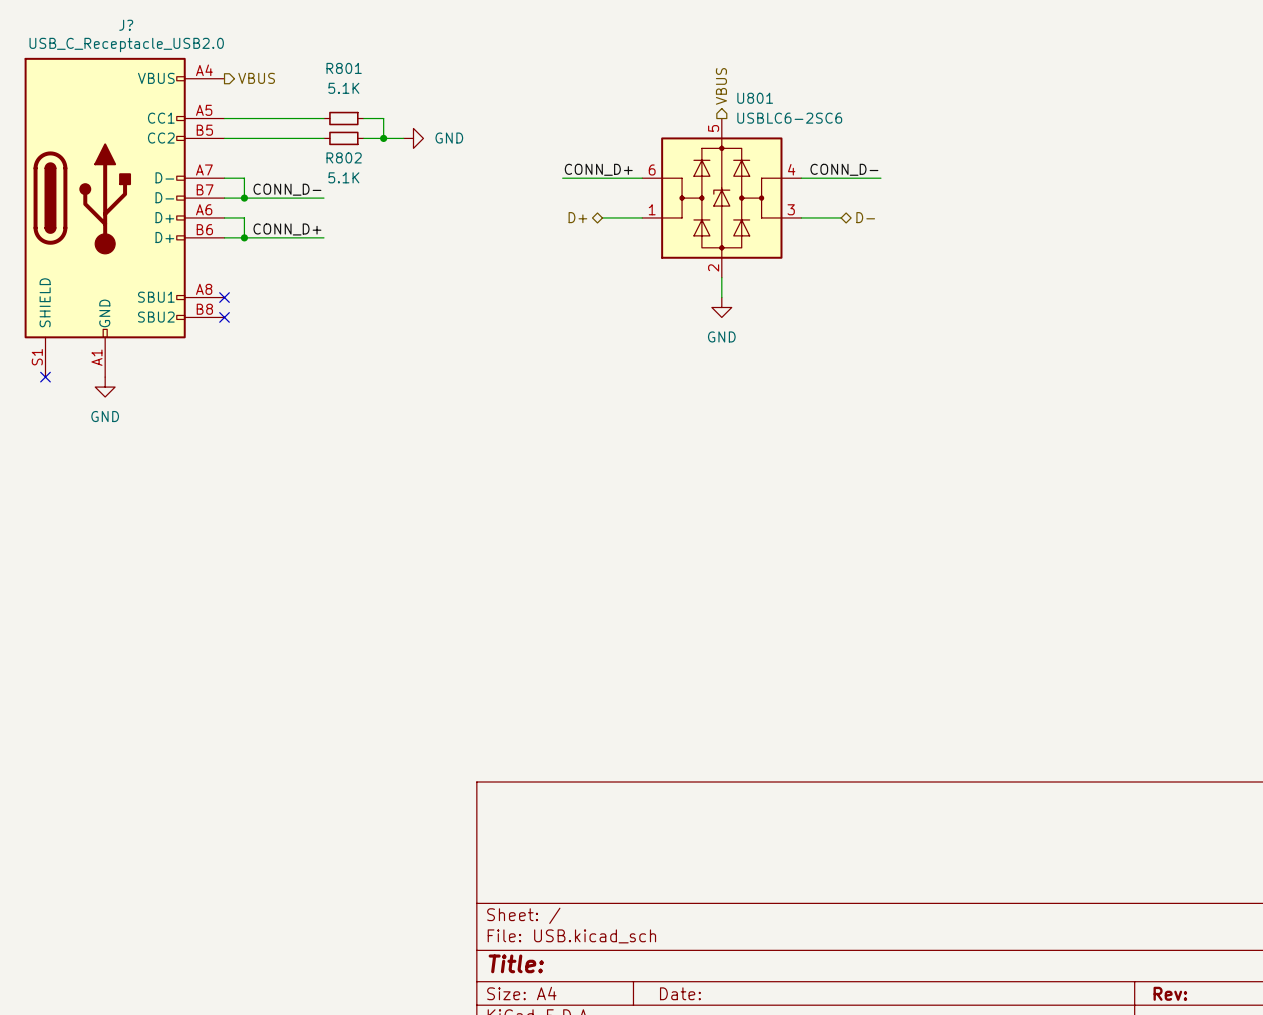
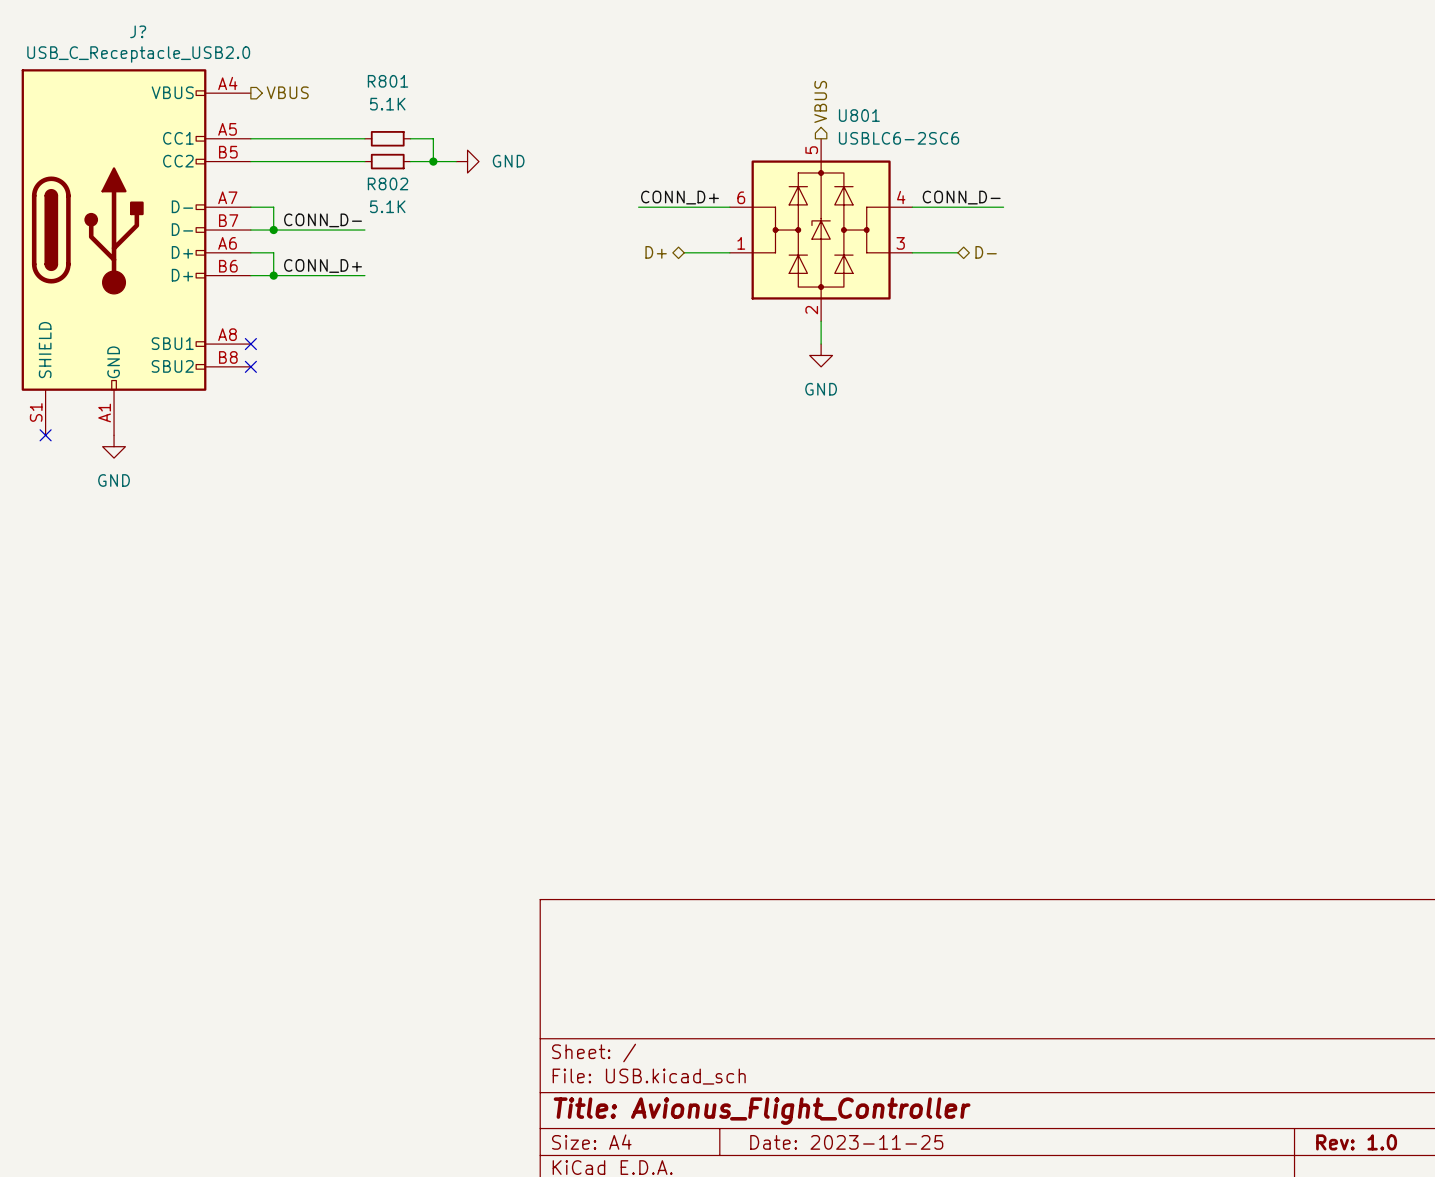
title block: Title: (516, 963) -> Title: Avionus_Flight_Controller (762, 1111)
title block: Date: (680, 993) -> Date: 2023-11-25 (846, 1142)
title block: Rev: (1170, 993) -> Rev: 1.0 (1356, 1142)

